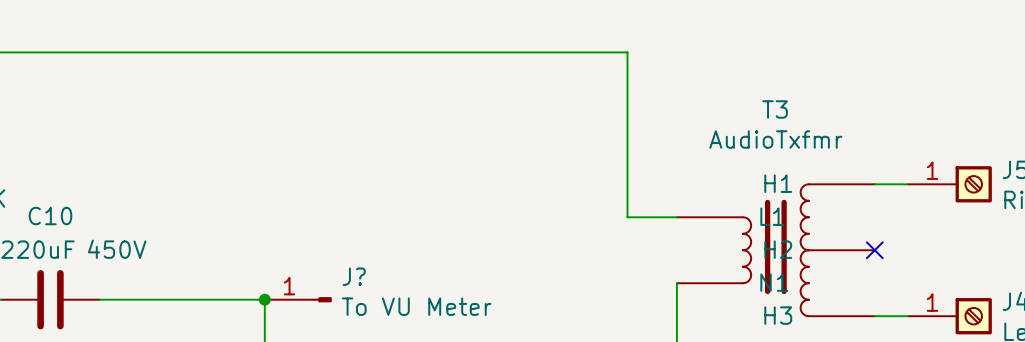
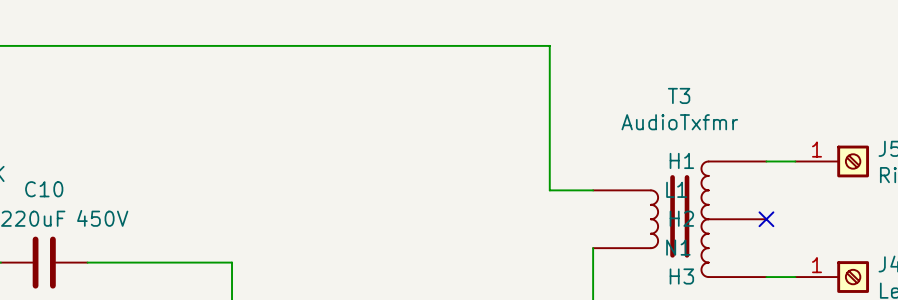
junction: (264, 299) -> none
J?: To VU Meter (298, 299) -> none

